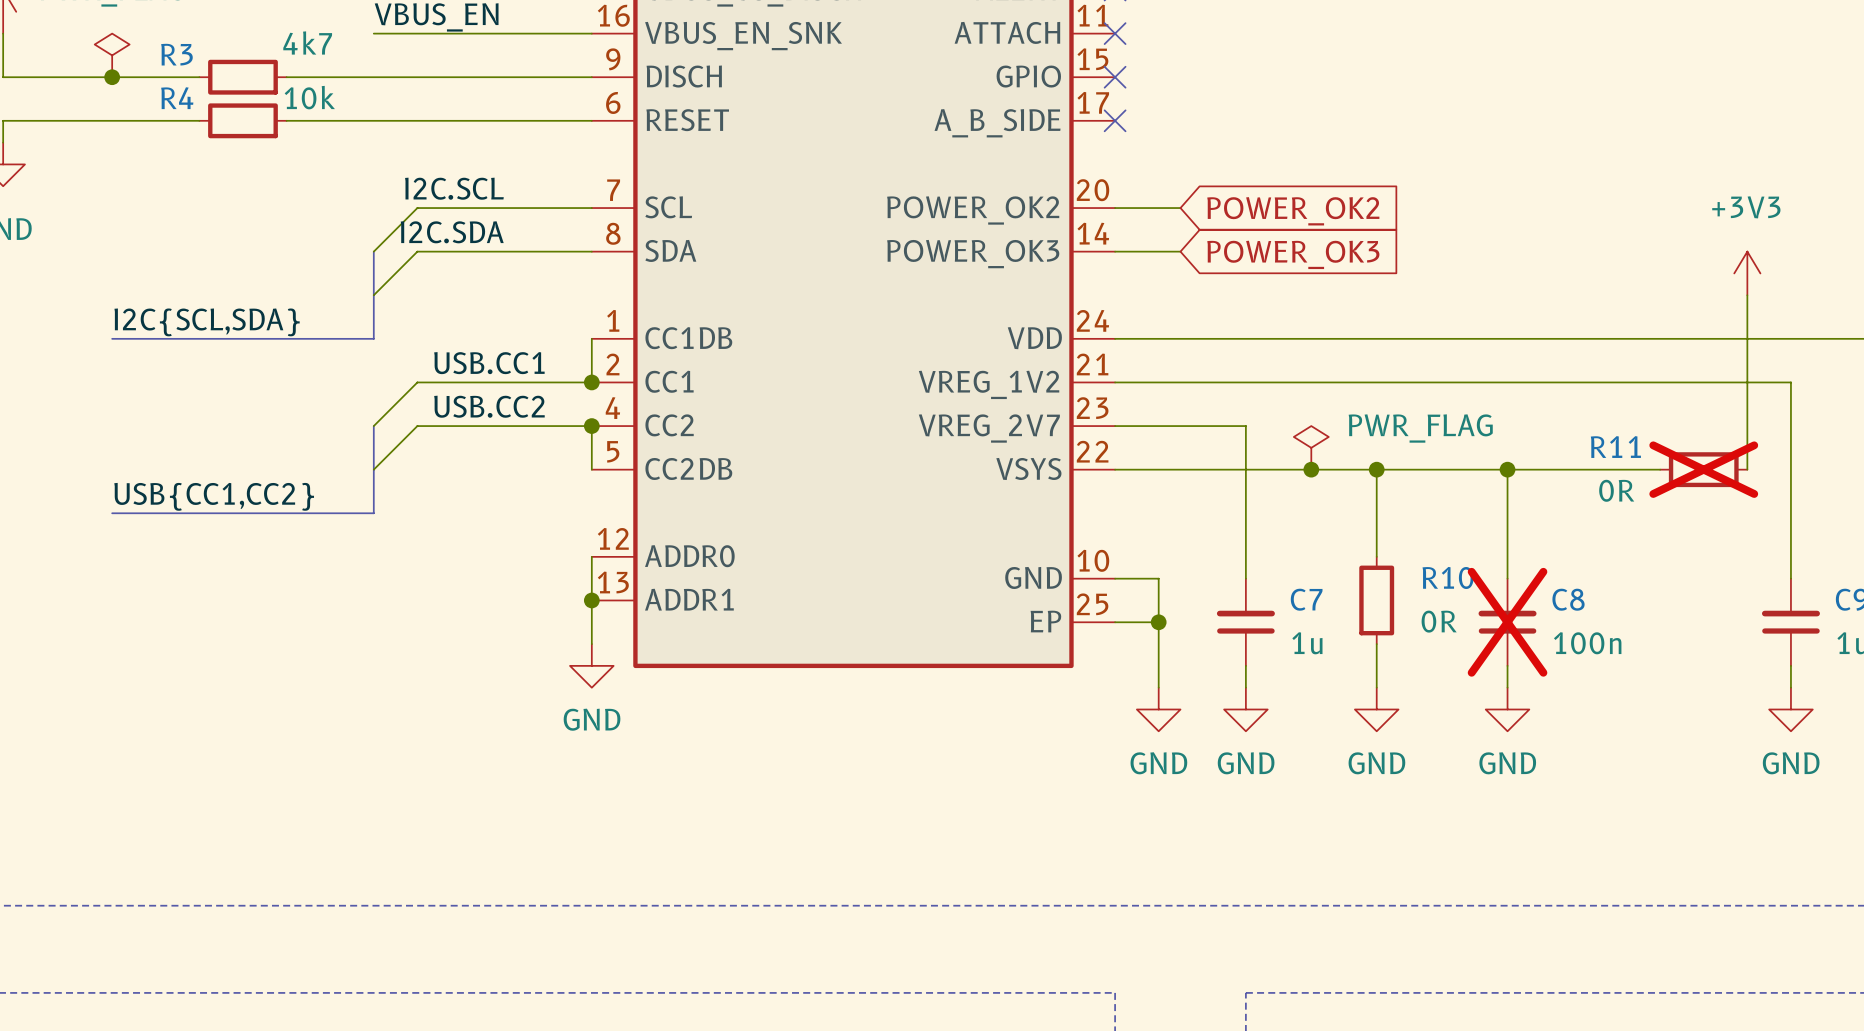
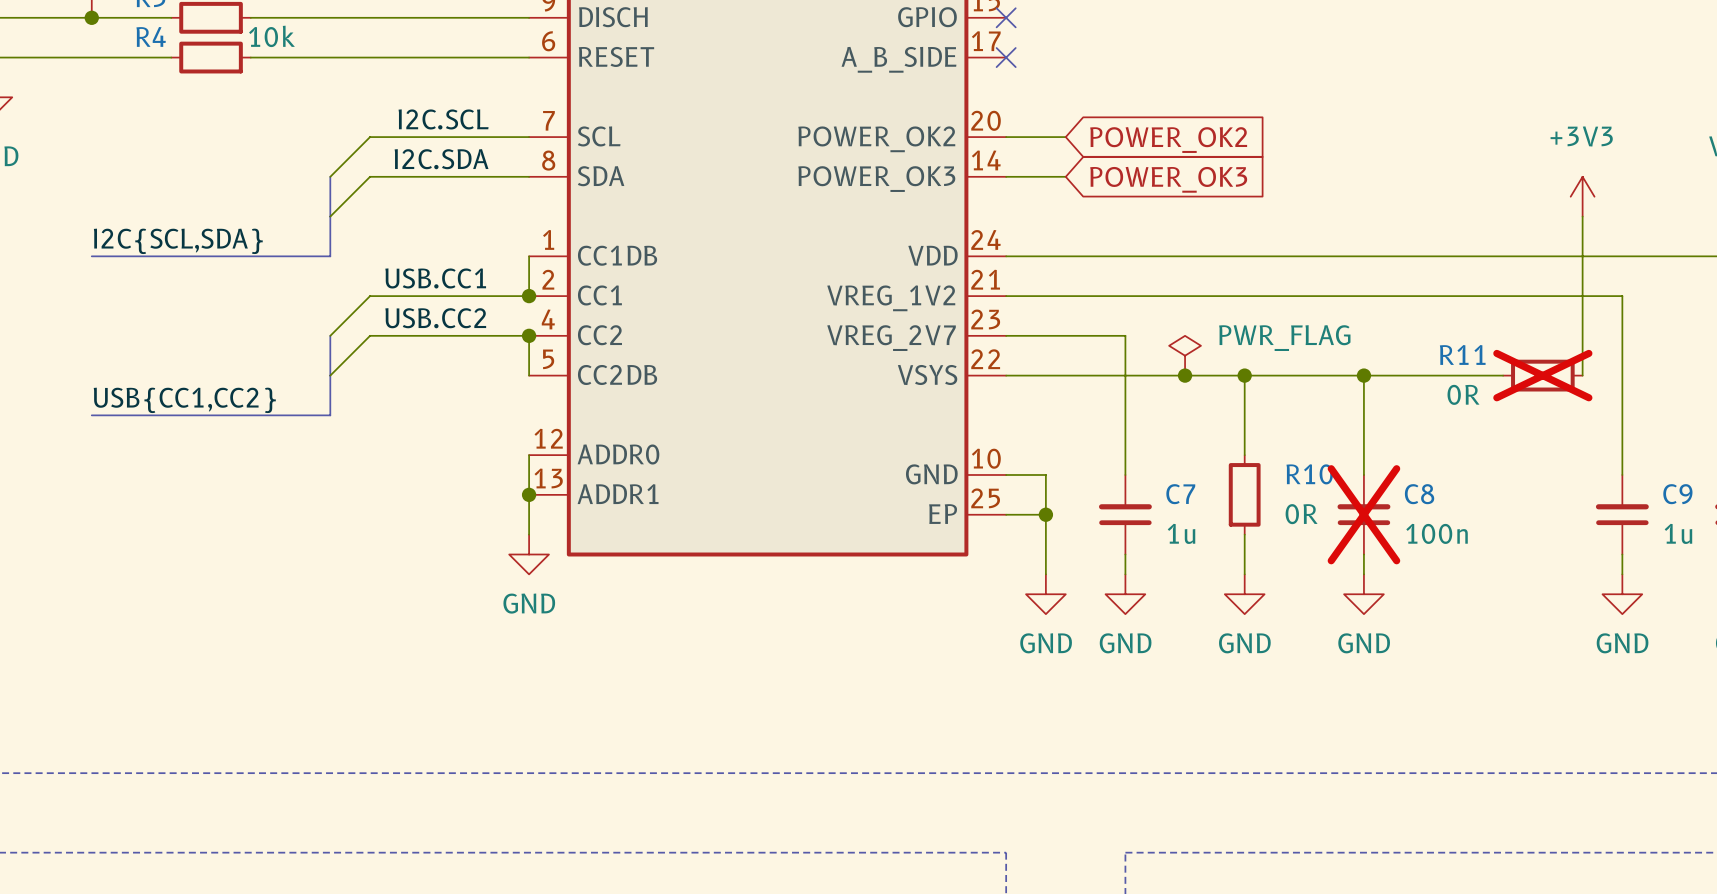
label position: I2C.SCL (454, 188) -> I2C.SCL (443, 119)
label position: I2C.SDA (452, 232) -> I2C.SDA (441, 159)

